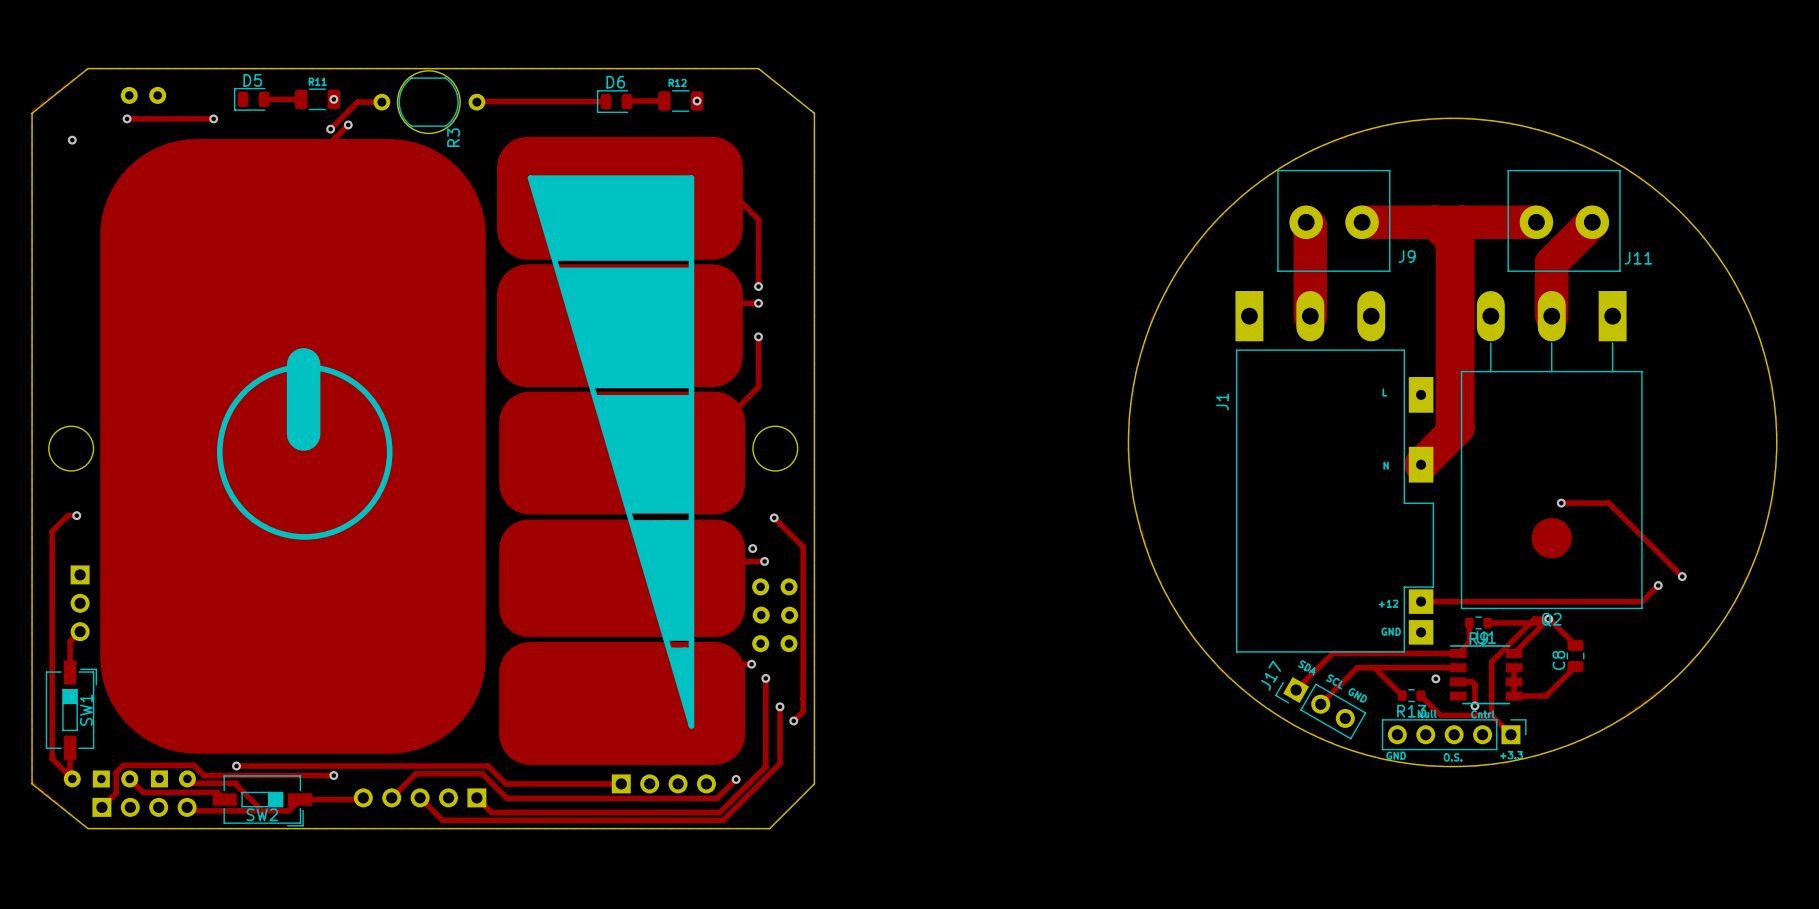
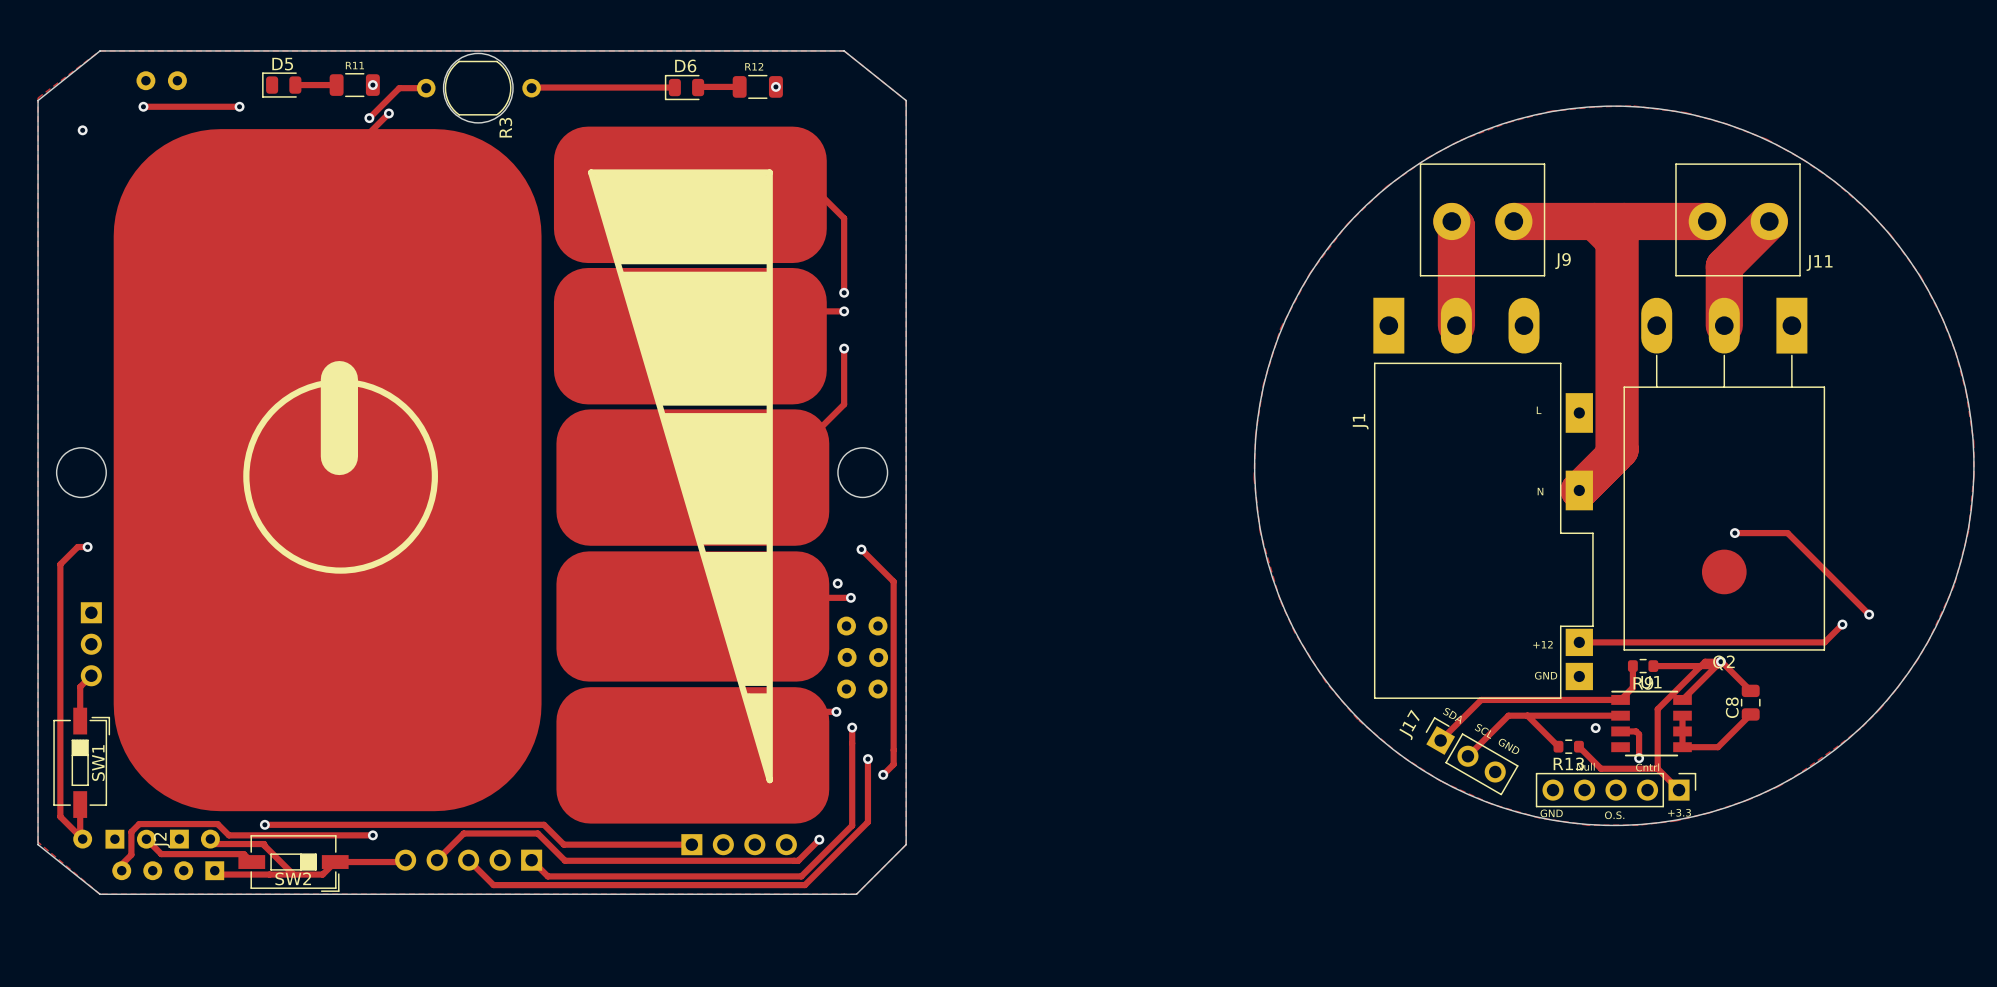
J17 footprint: [1275, 677, 1367, 740] -> [1425, 717, 1519, 796]
J2 name: none -> J2 (161, 840)
part footprint: [92, 797, 197, 817] -> [112, 861, 225, 881]

